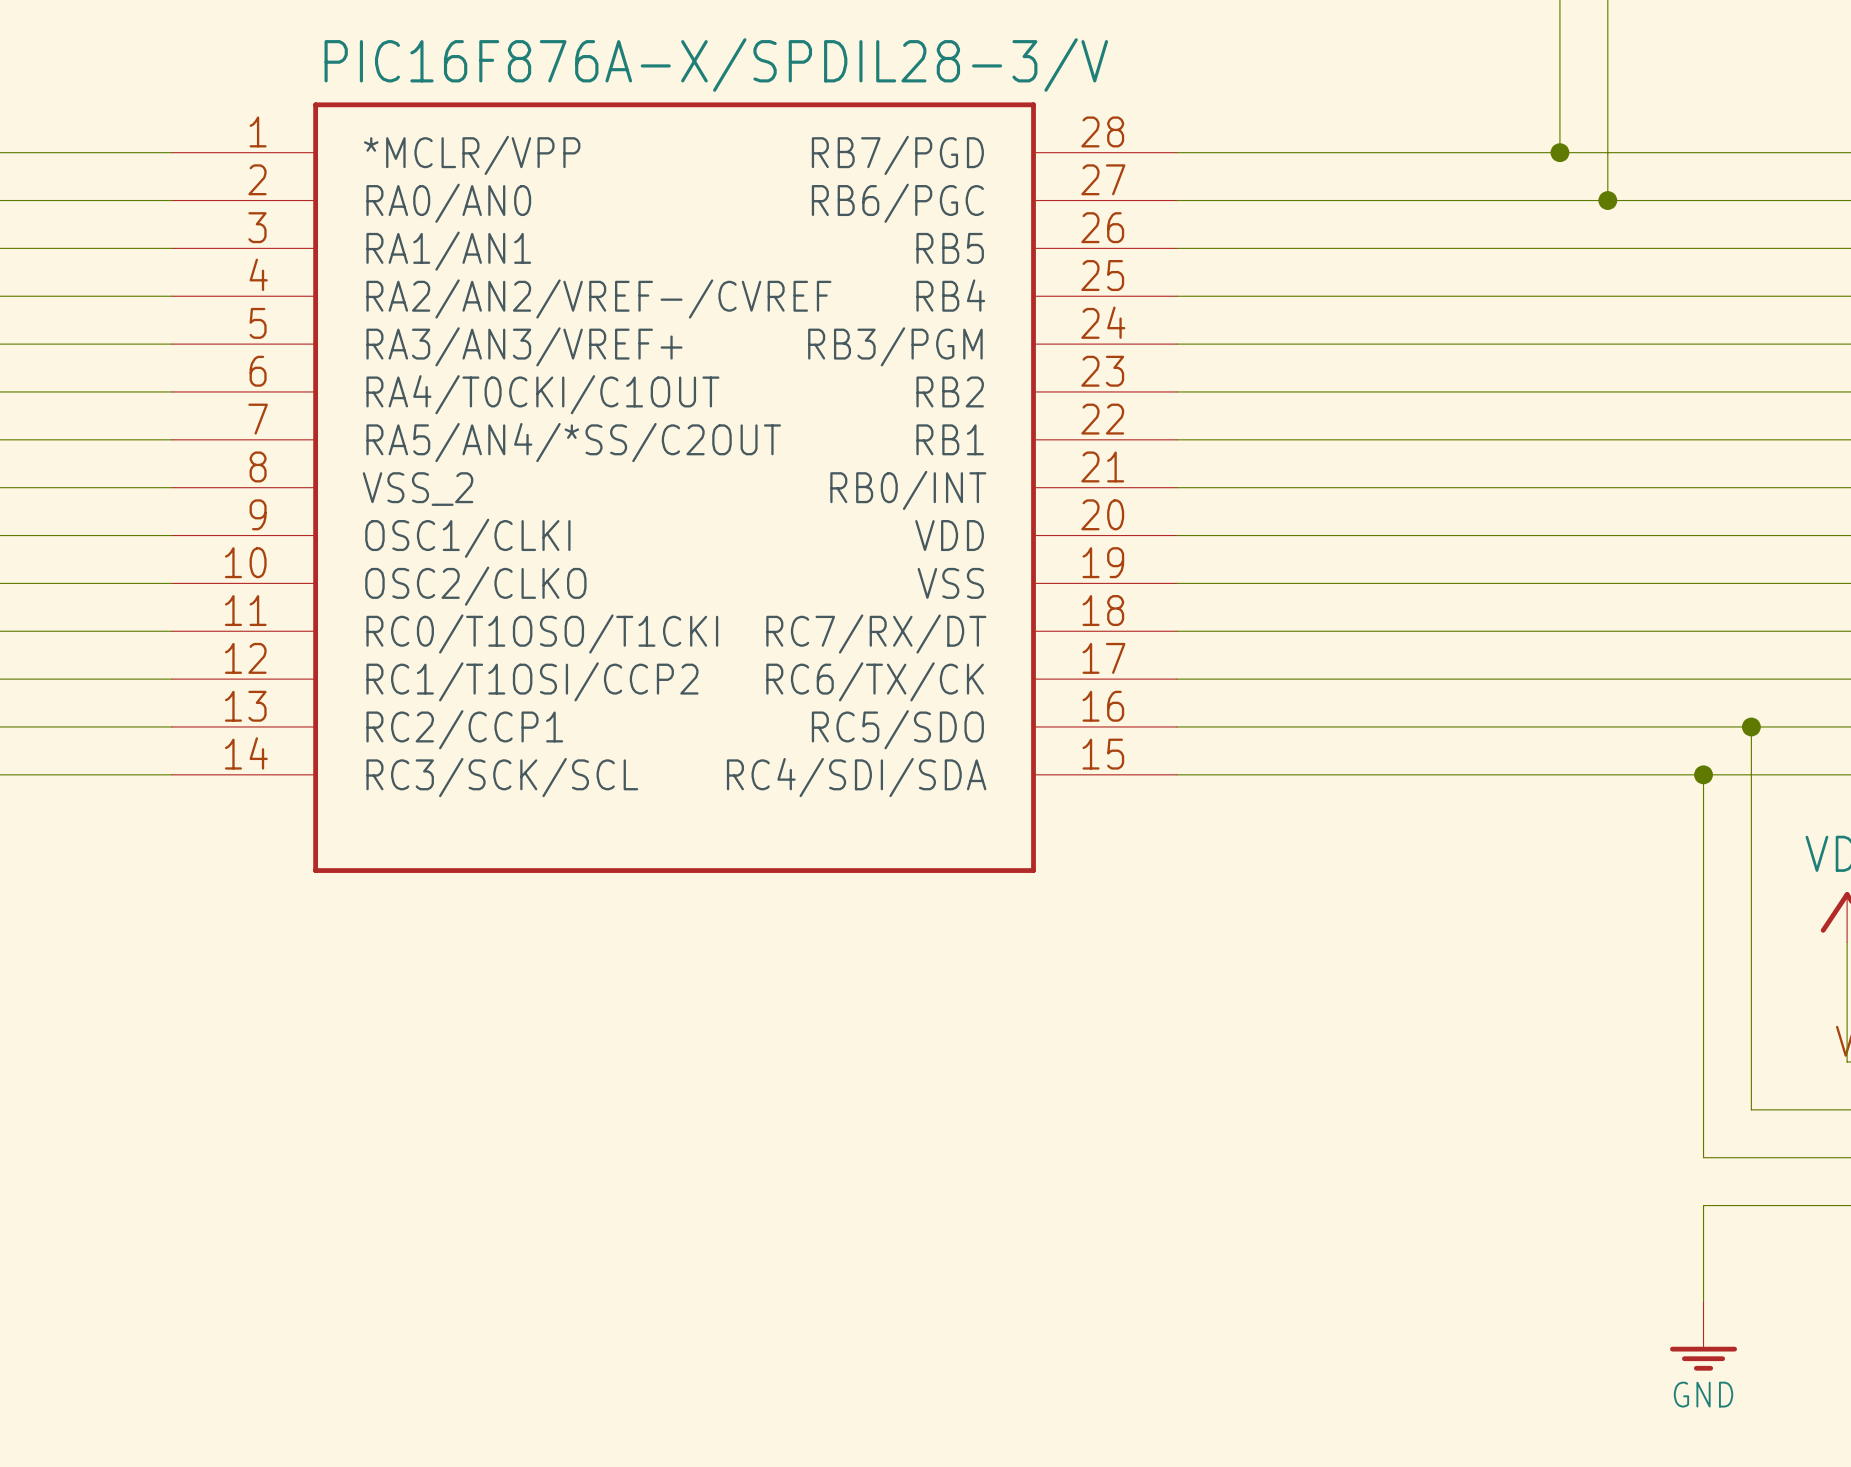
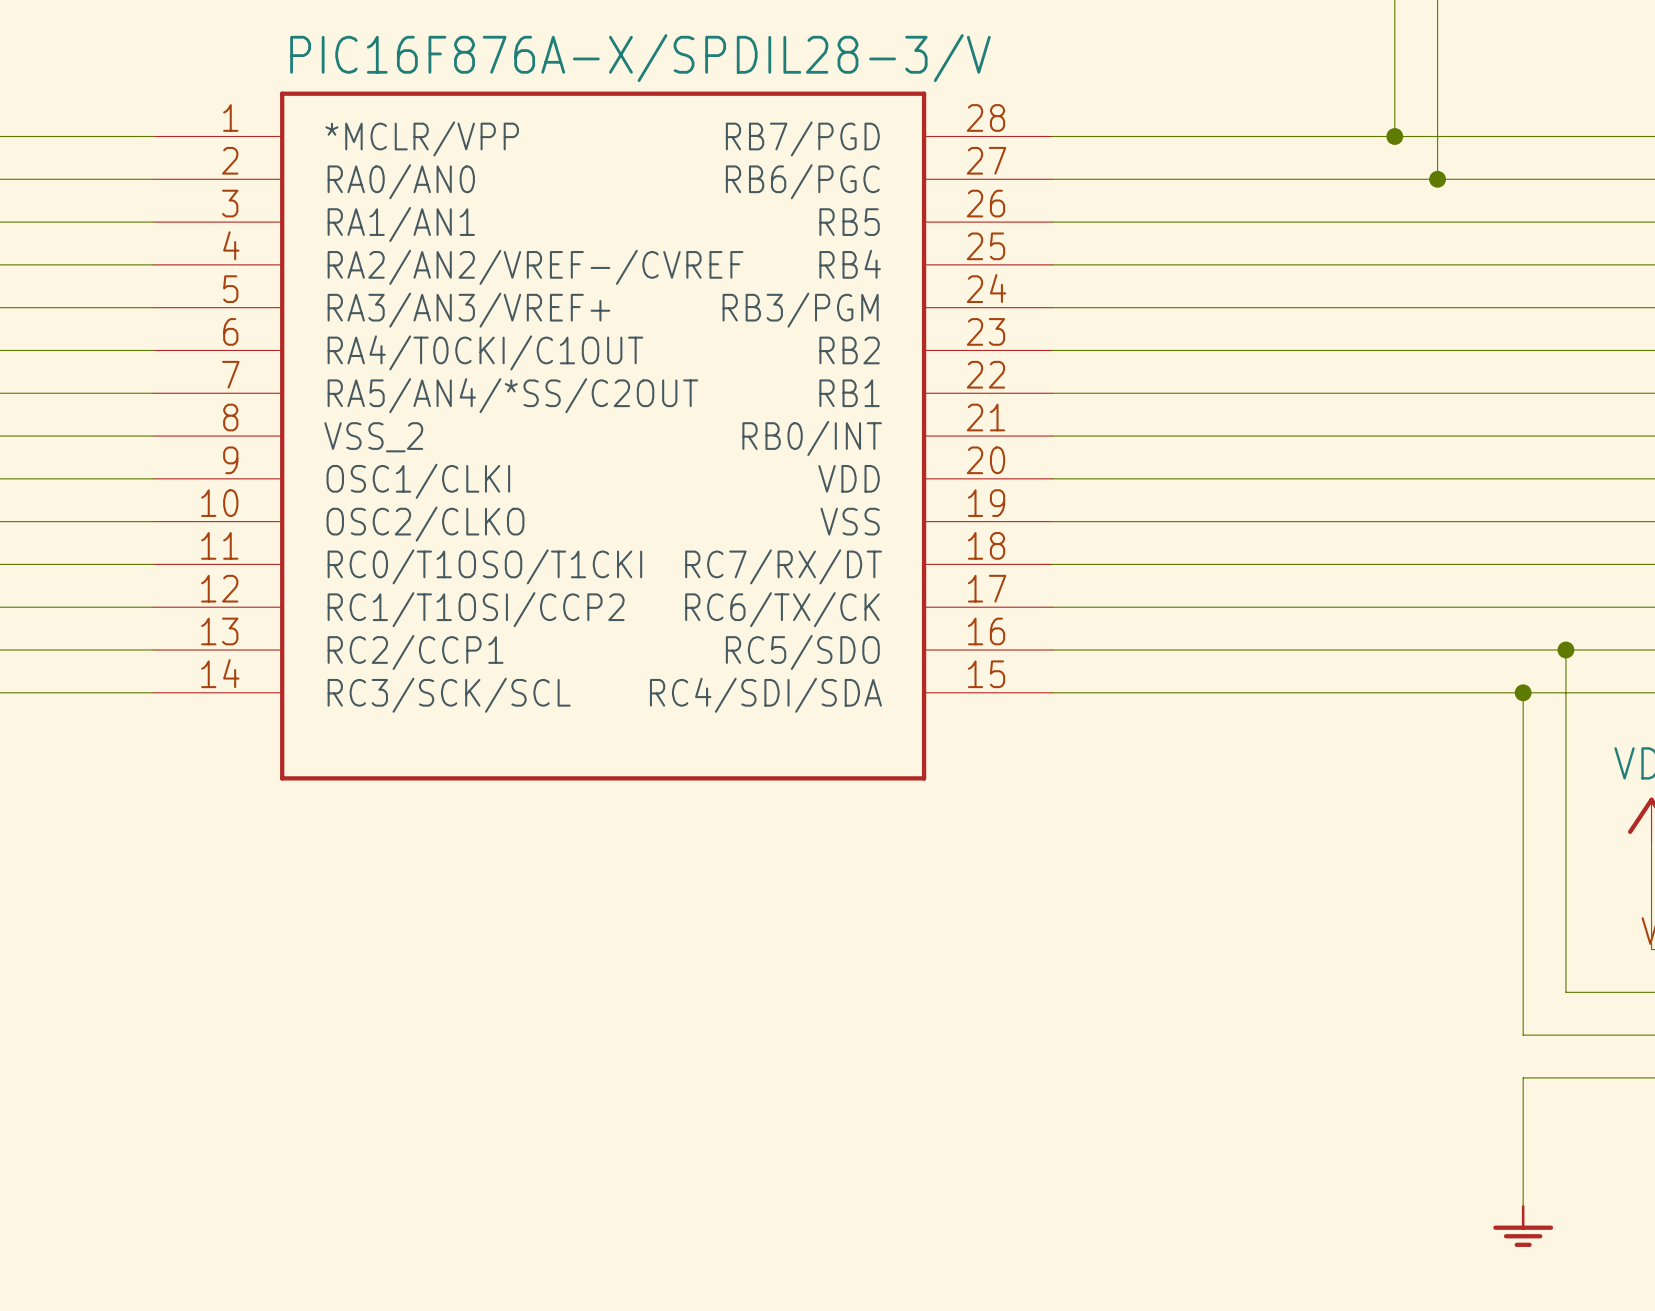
power symbol: GND (1703, 1335) -> none
power symbol: none -> (1523, 1225)

